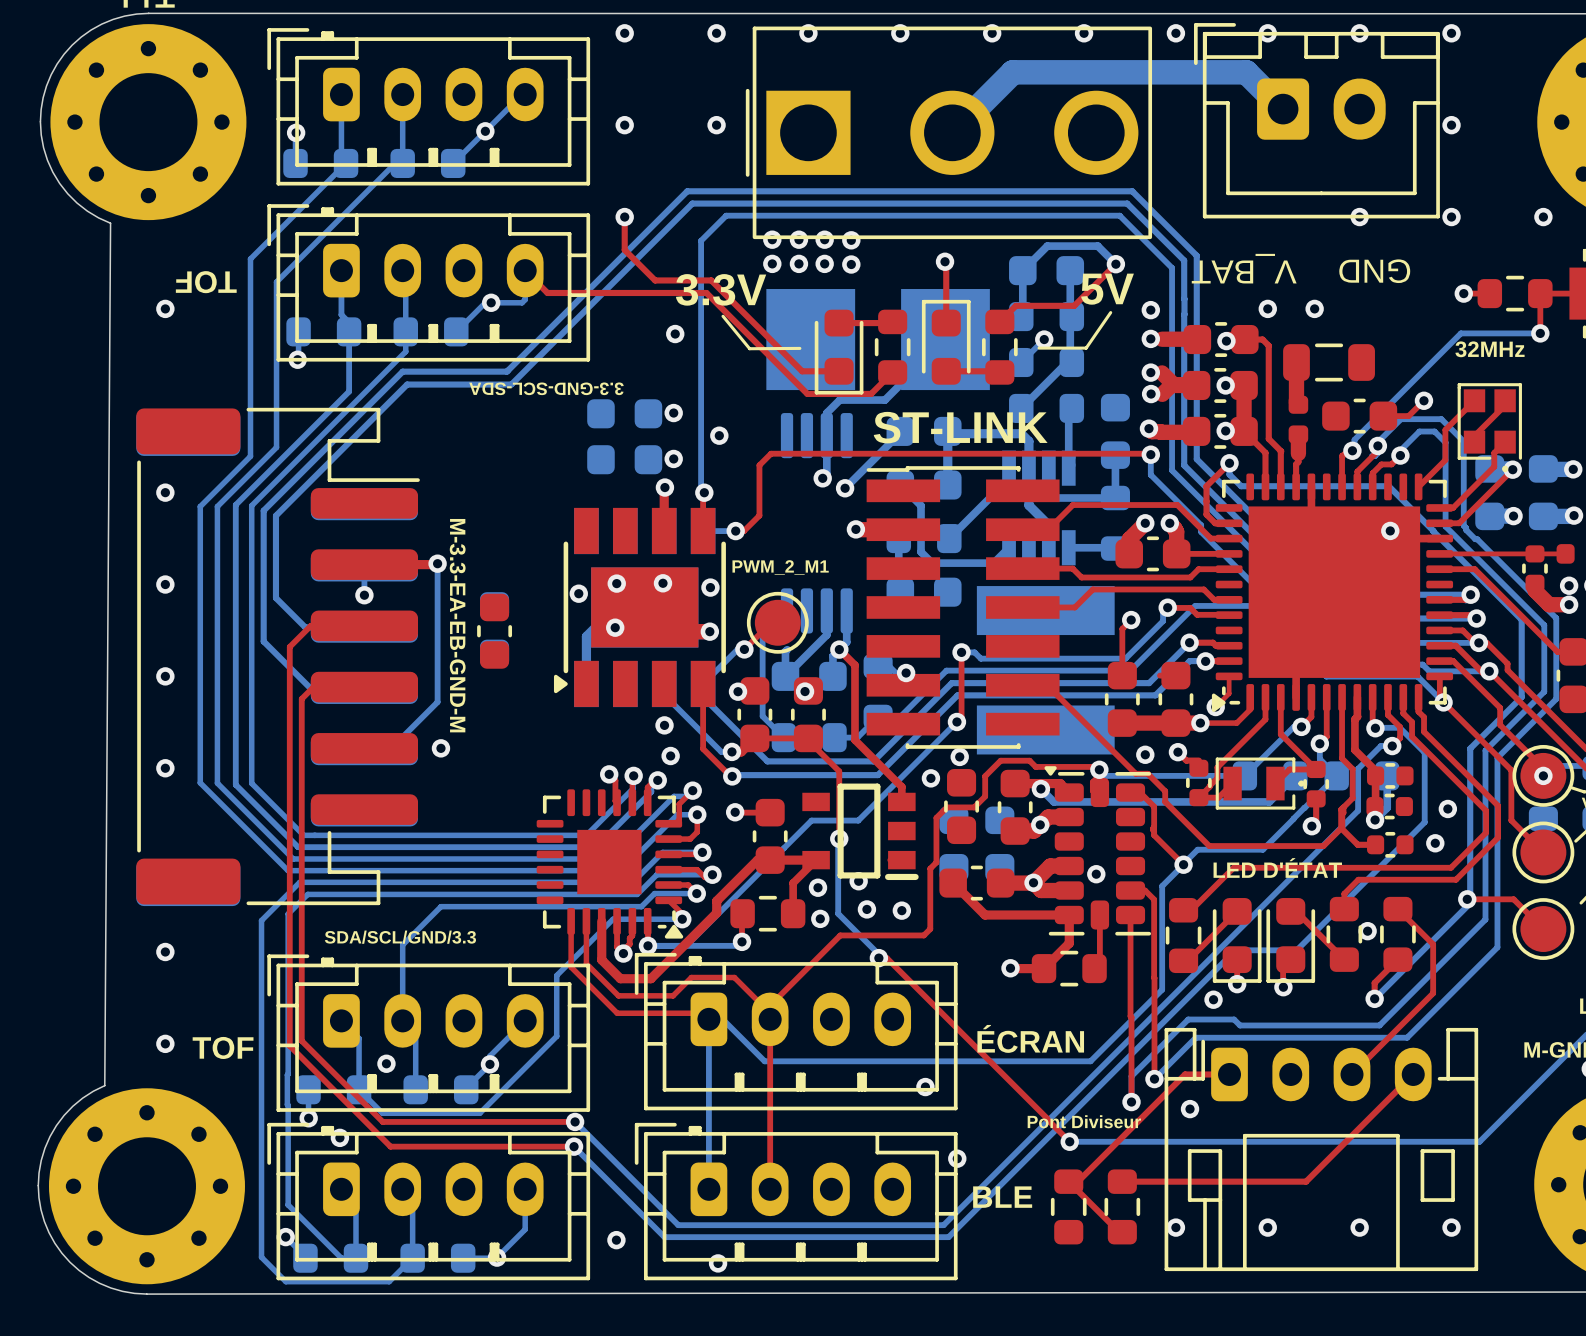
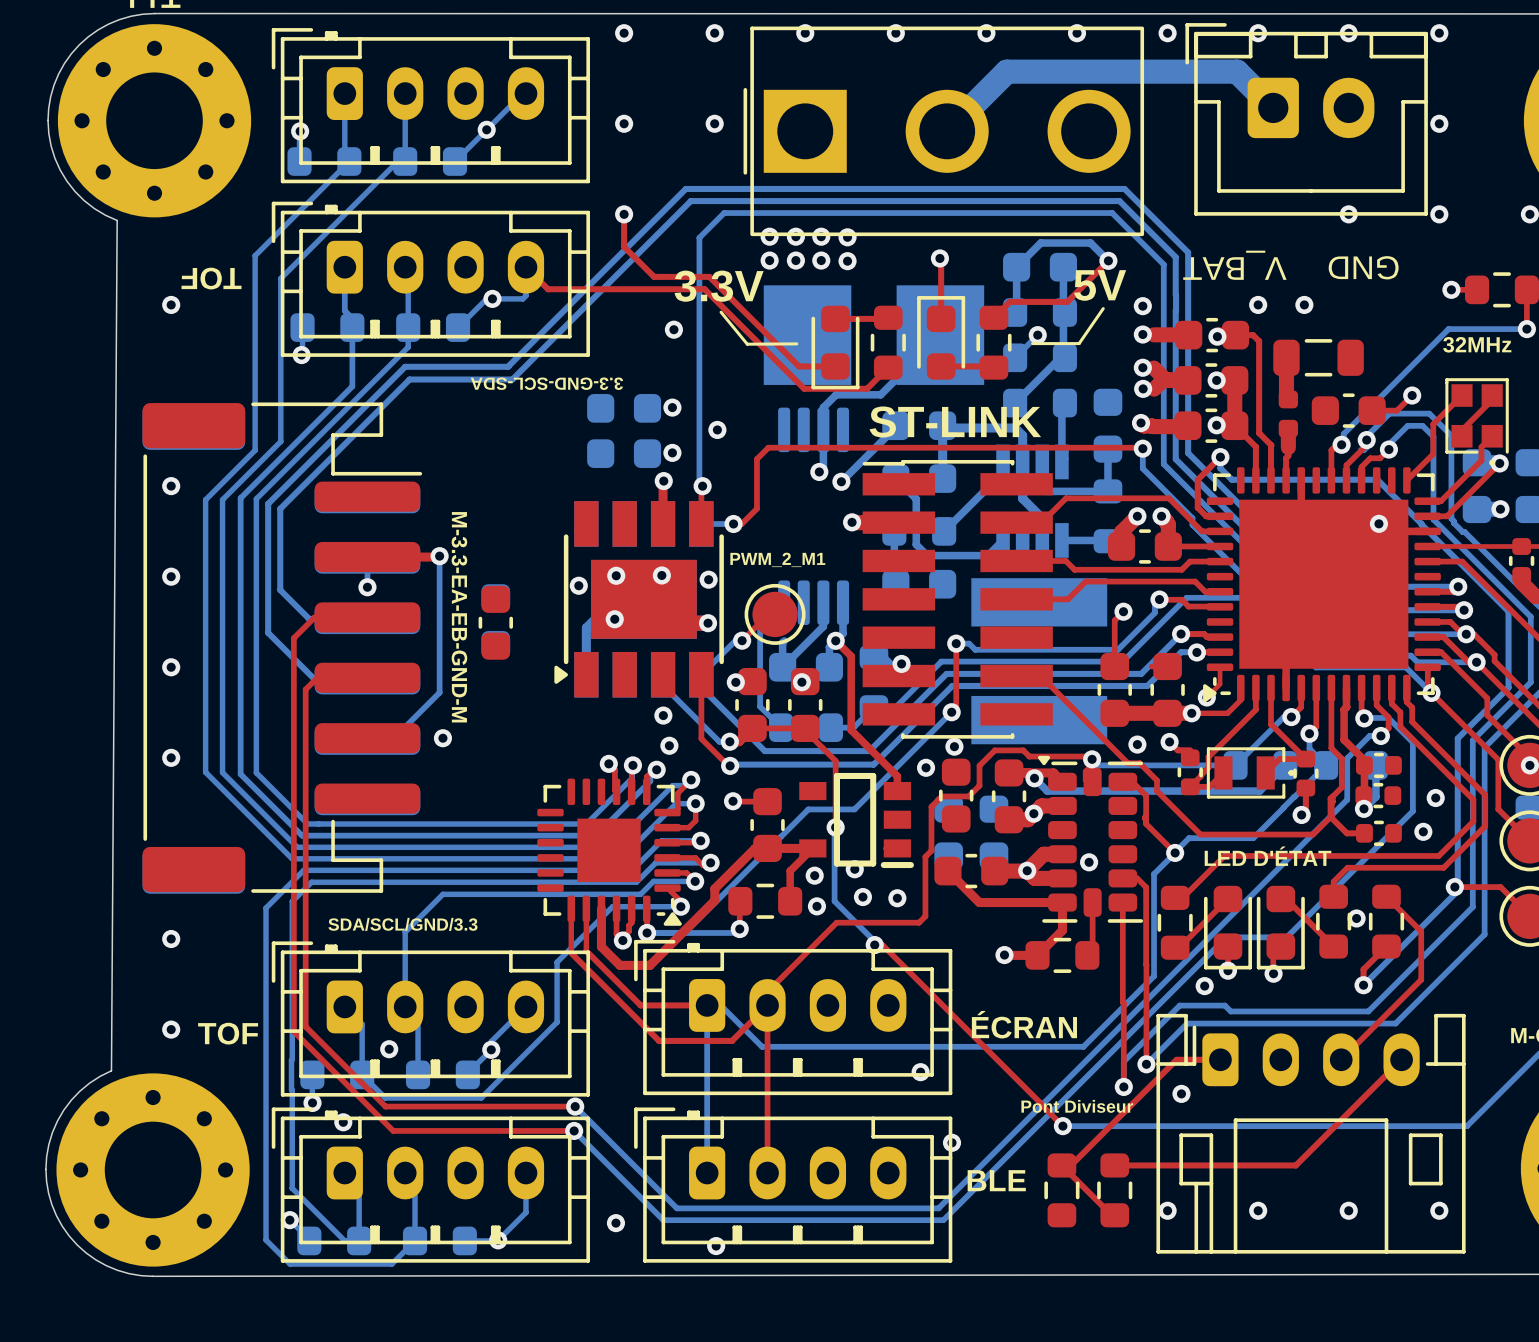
top track: (586, 963) (618, 995) (673, 995) (691, 977) (734, 977) (770, 1013) -> (586, 951) (640, 1005) (707, 1005)
top track: (571, 966) (617, 1013) (708, 1013) -> (571, 953) (659, 1040) (732, 1040) (767, 1005)

